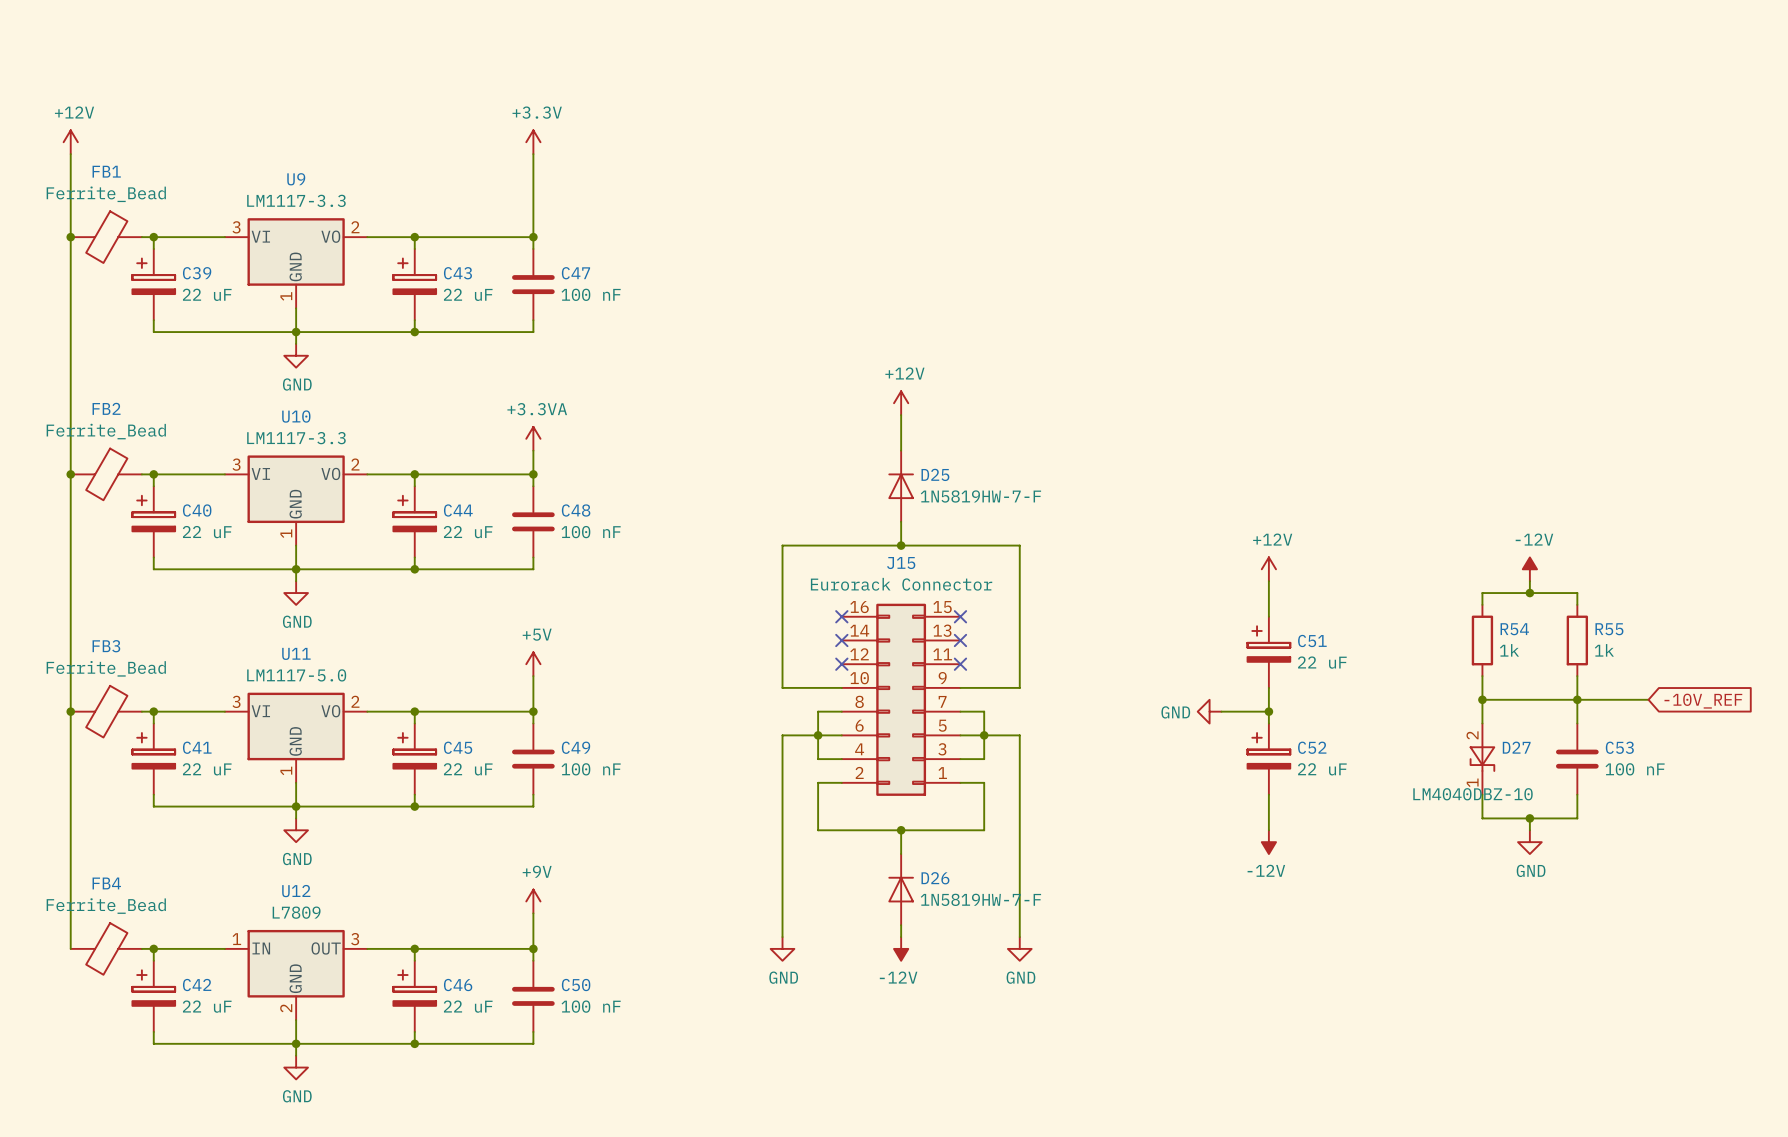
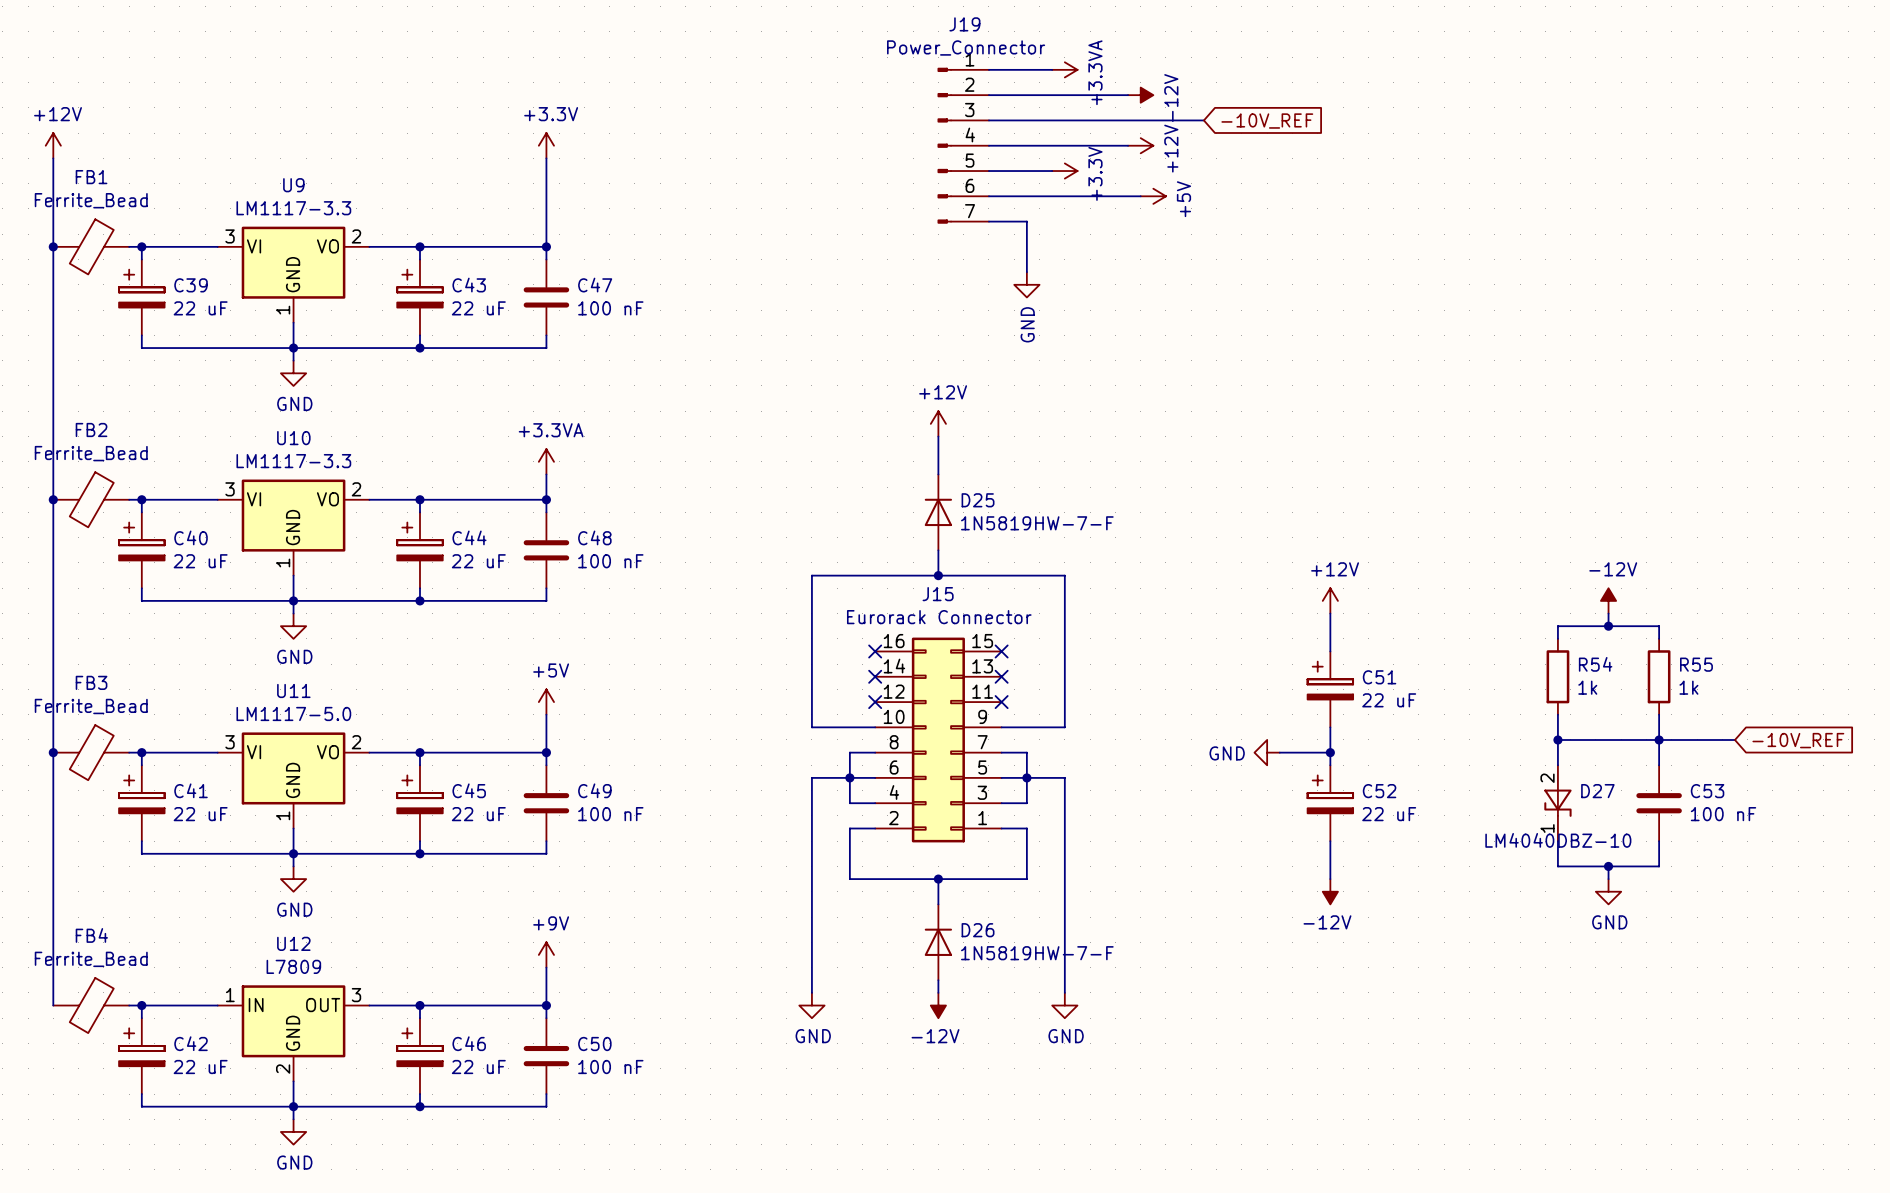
wire: none -> (988, 69) (1052, 69)
power symbol: none -> +3.3VA (1064, 69)
wire: none -> (988, 95) (1128, 95)
power symbol: none -> -12V (1140, 95)
wire: none -> (988, 120) (1203, 120)
global label: none -> -10V_REF (1267, 121)
J19: none -> Power_Connector (963, 145)
wire: none -> (988, 145) (1128, 145)
power symbol: none -> +12V (1140, 145)
wire: none -> (988, 171) (1052, 171)
power symbol: none -> +3.3V (1064, 171)
wire: none -> (988, 196) (1140, 196)
power symbol: none -> +5V (1153, 196)
wire: none -> (988, 221) (1026, 221) (1026, 272)
power symbol: none -> GND (1026, 284)

